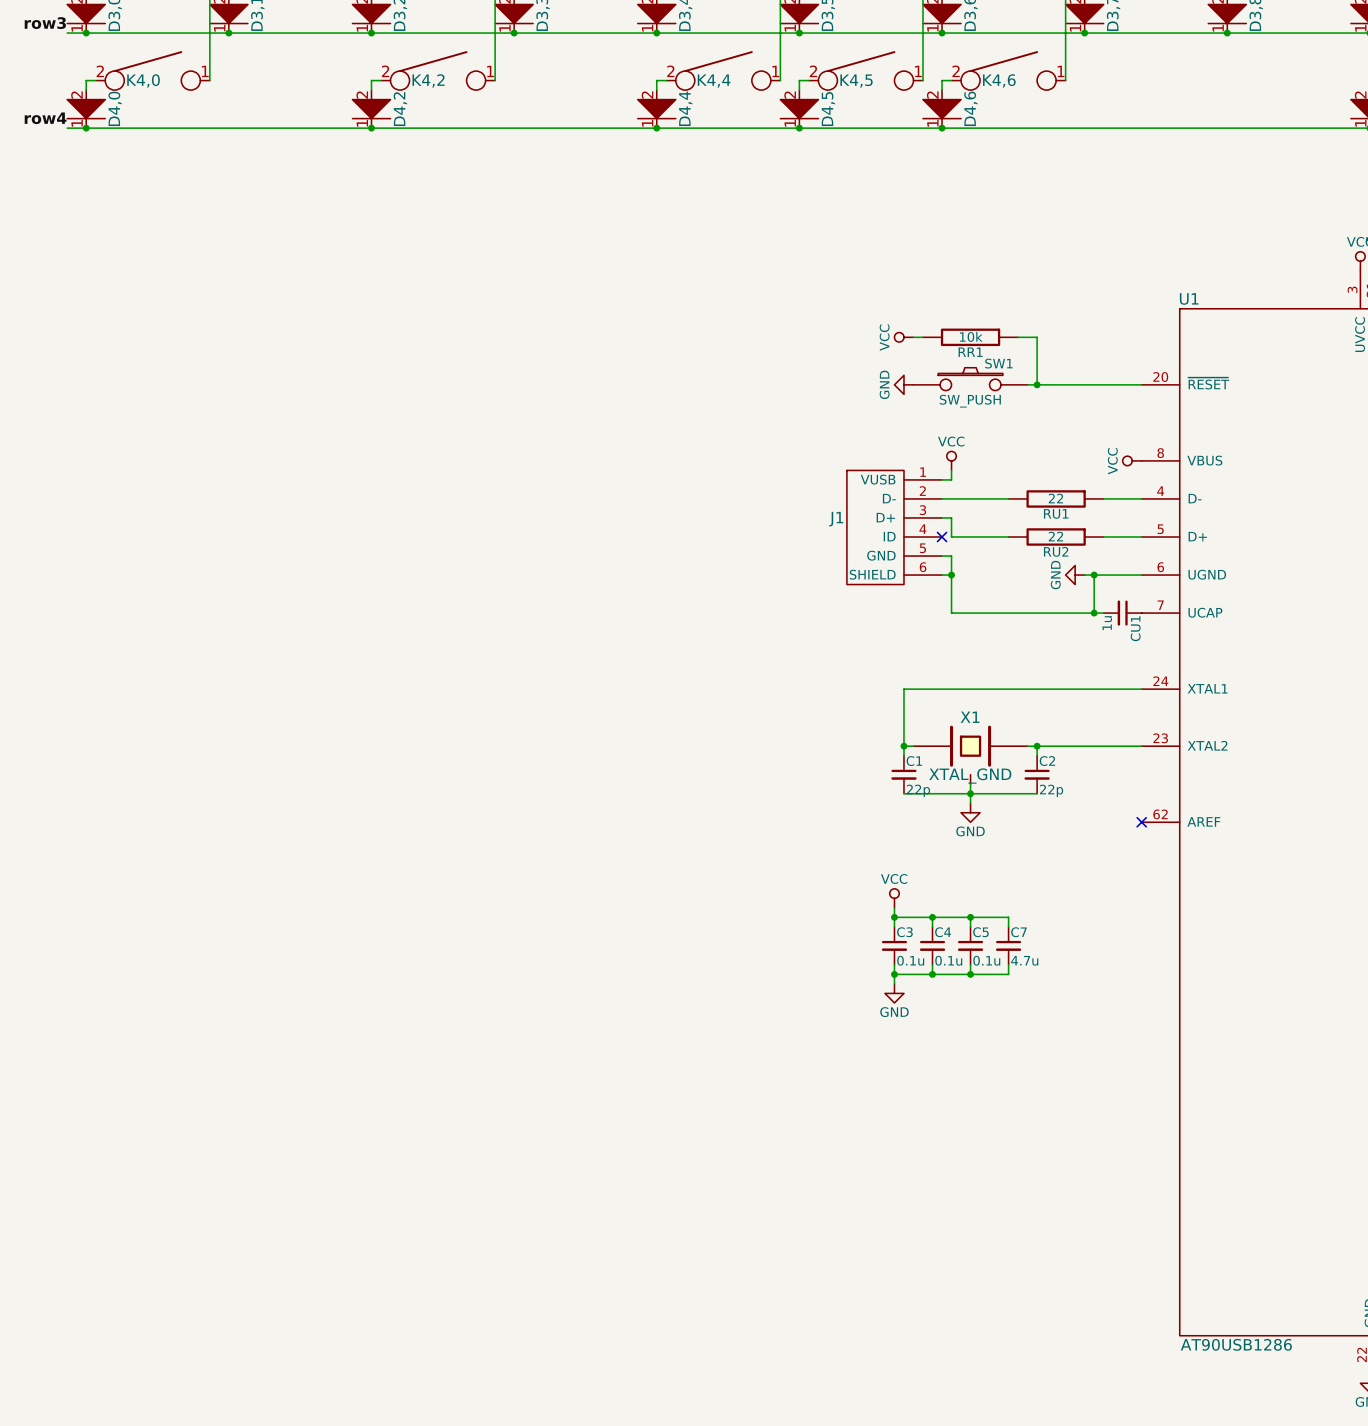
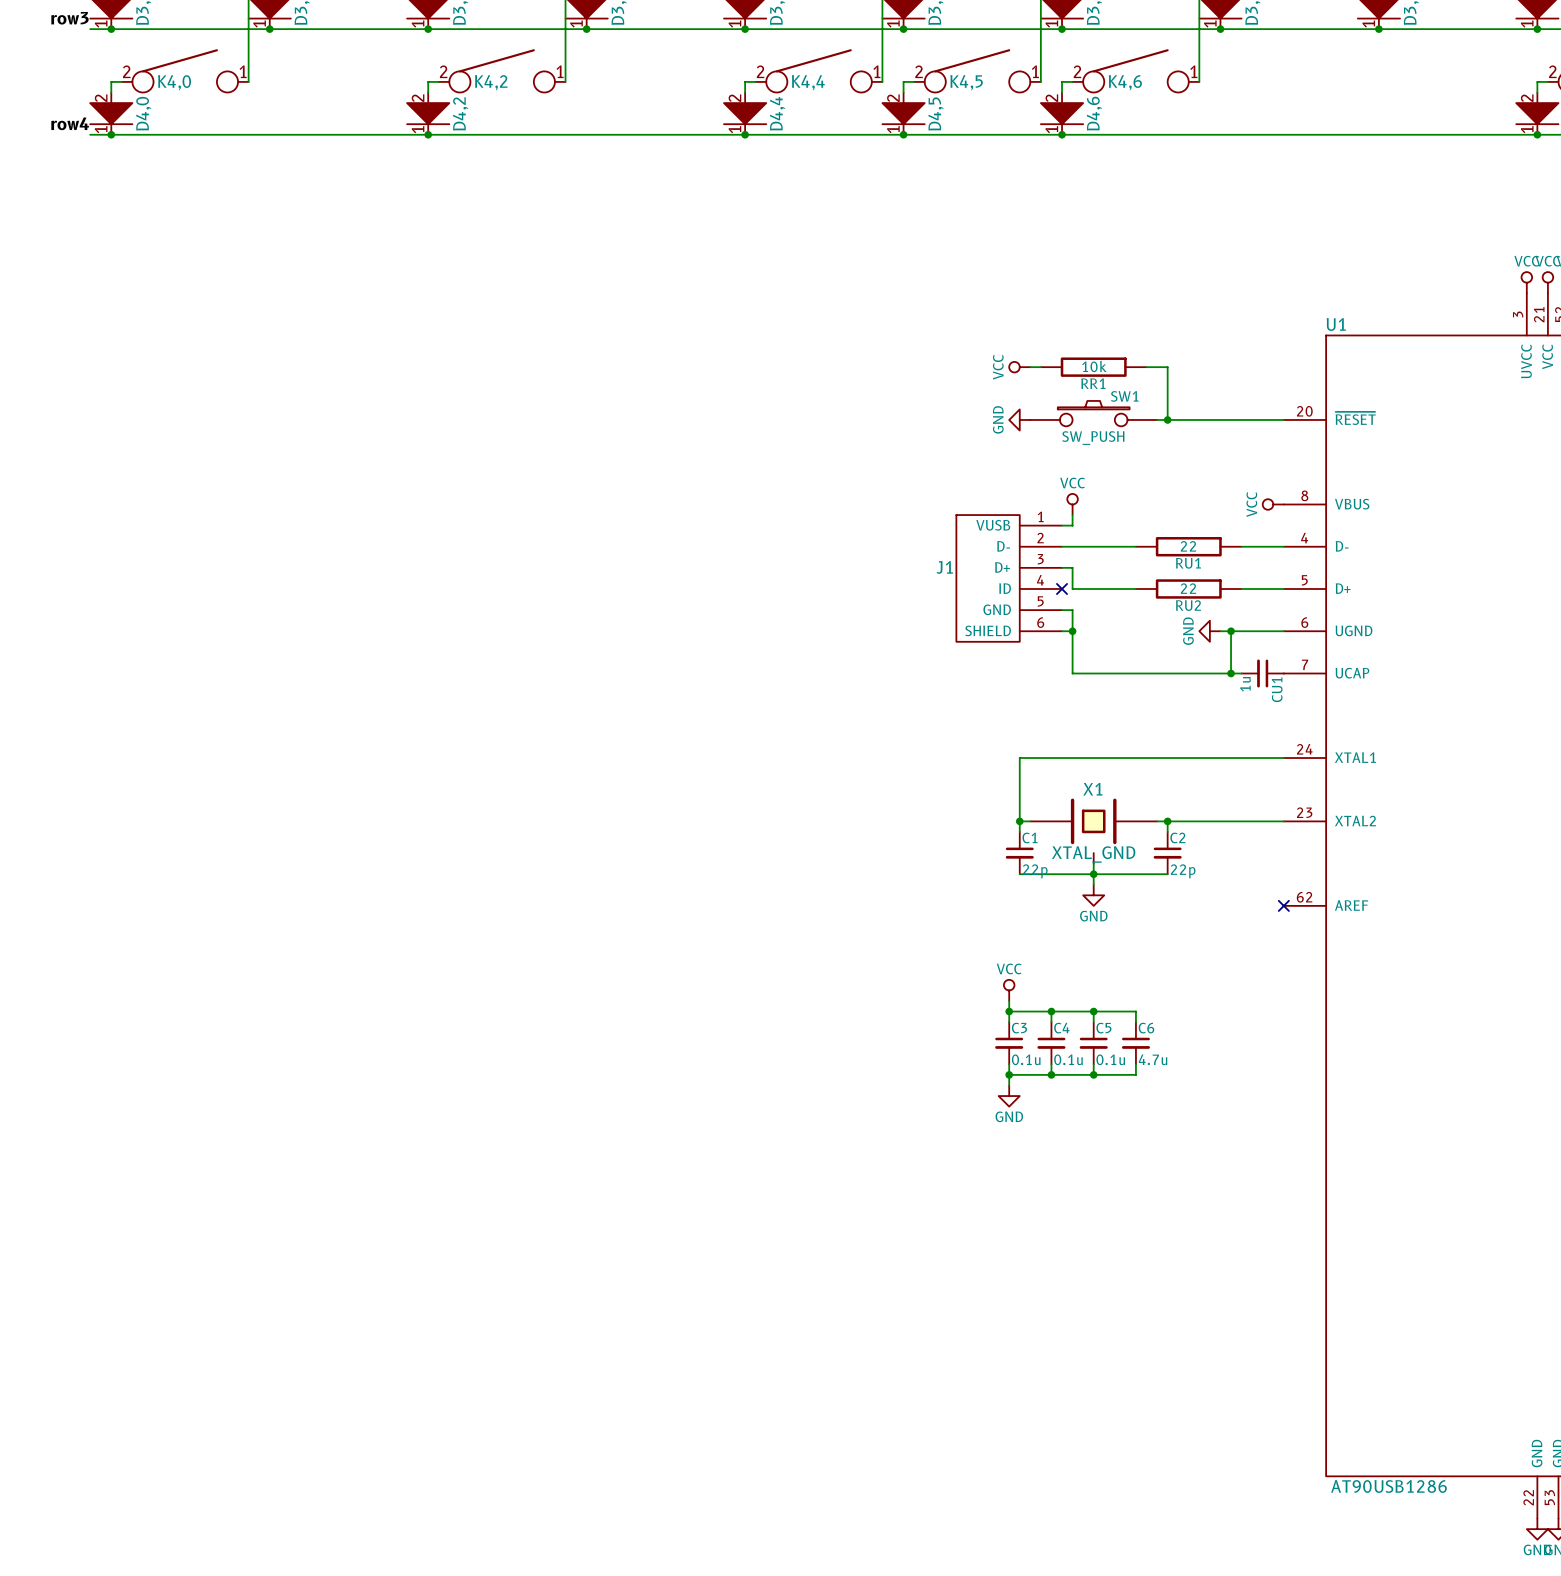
C7 name: C7 (1018, 932) -> C6 (1146, 1028)

